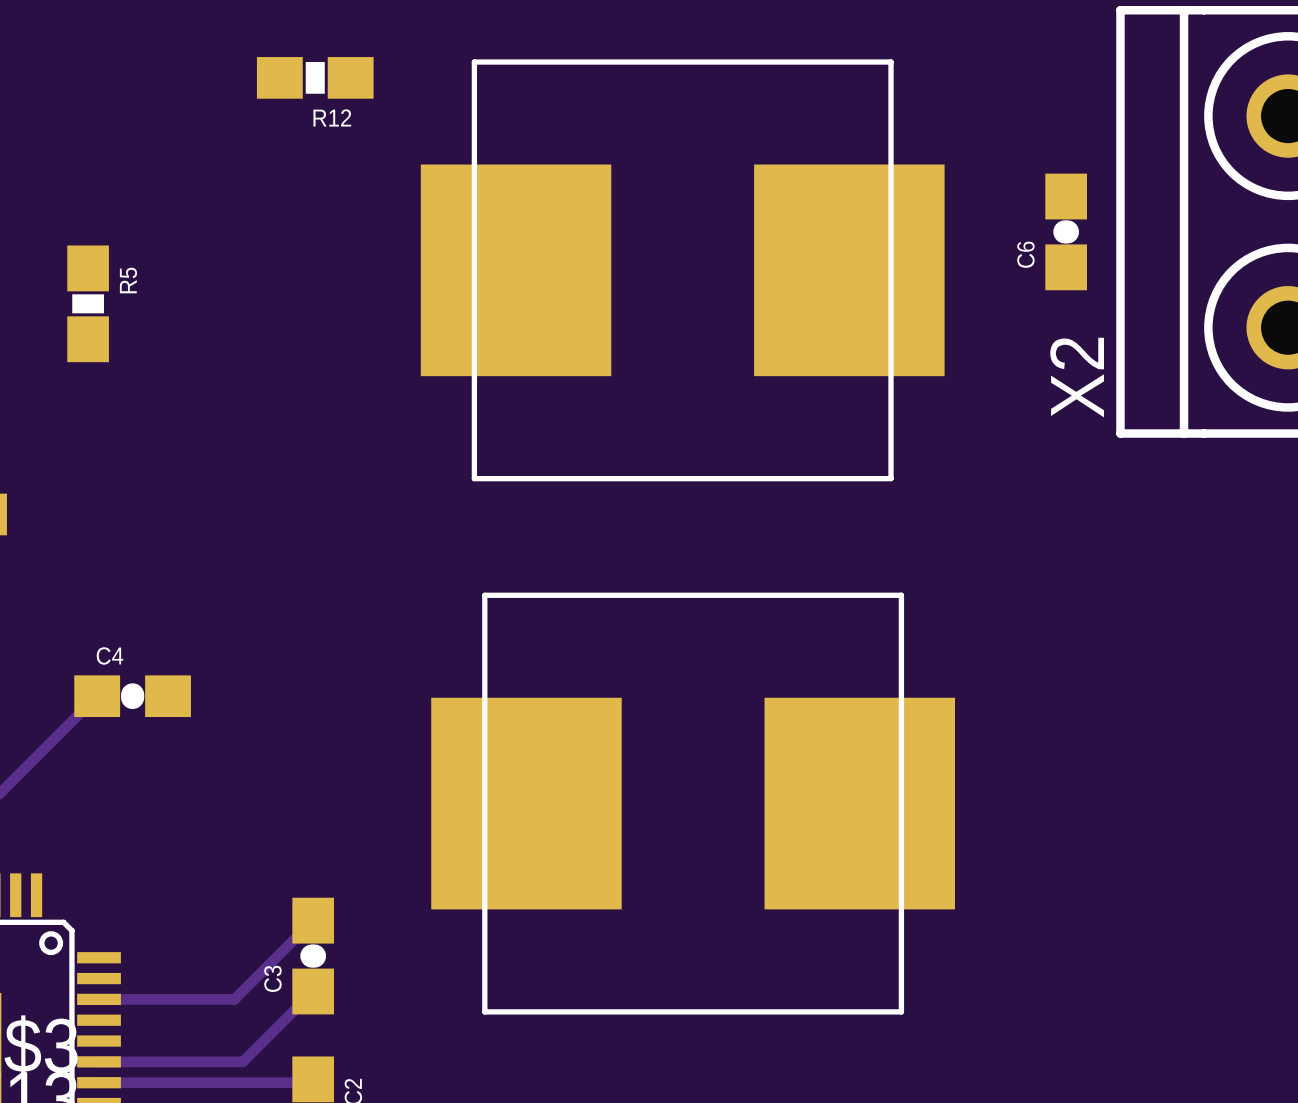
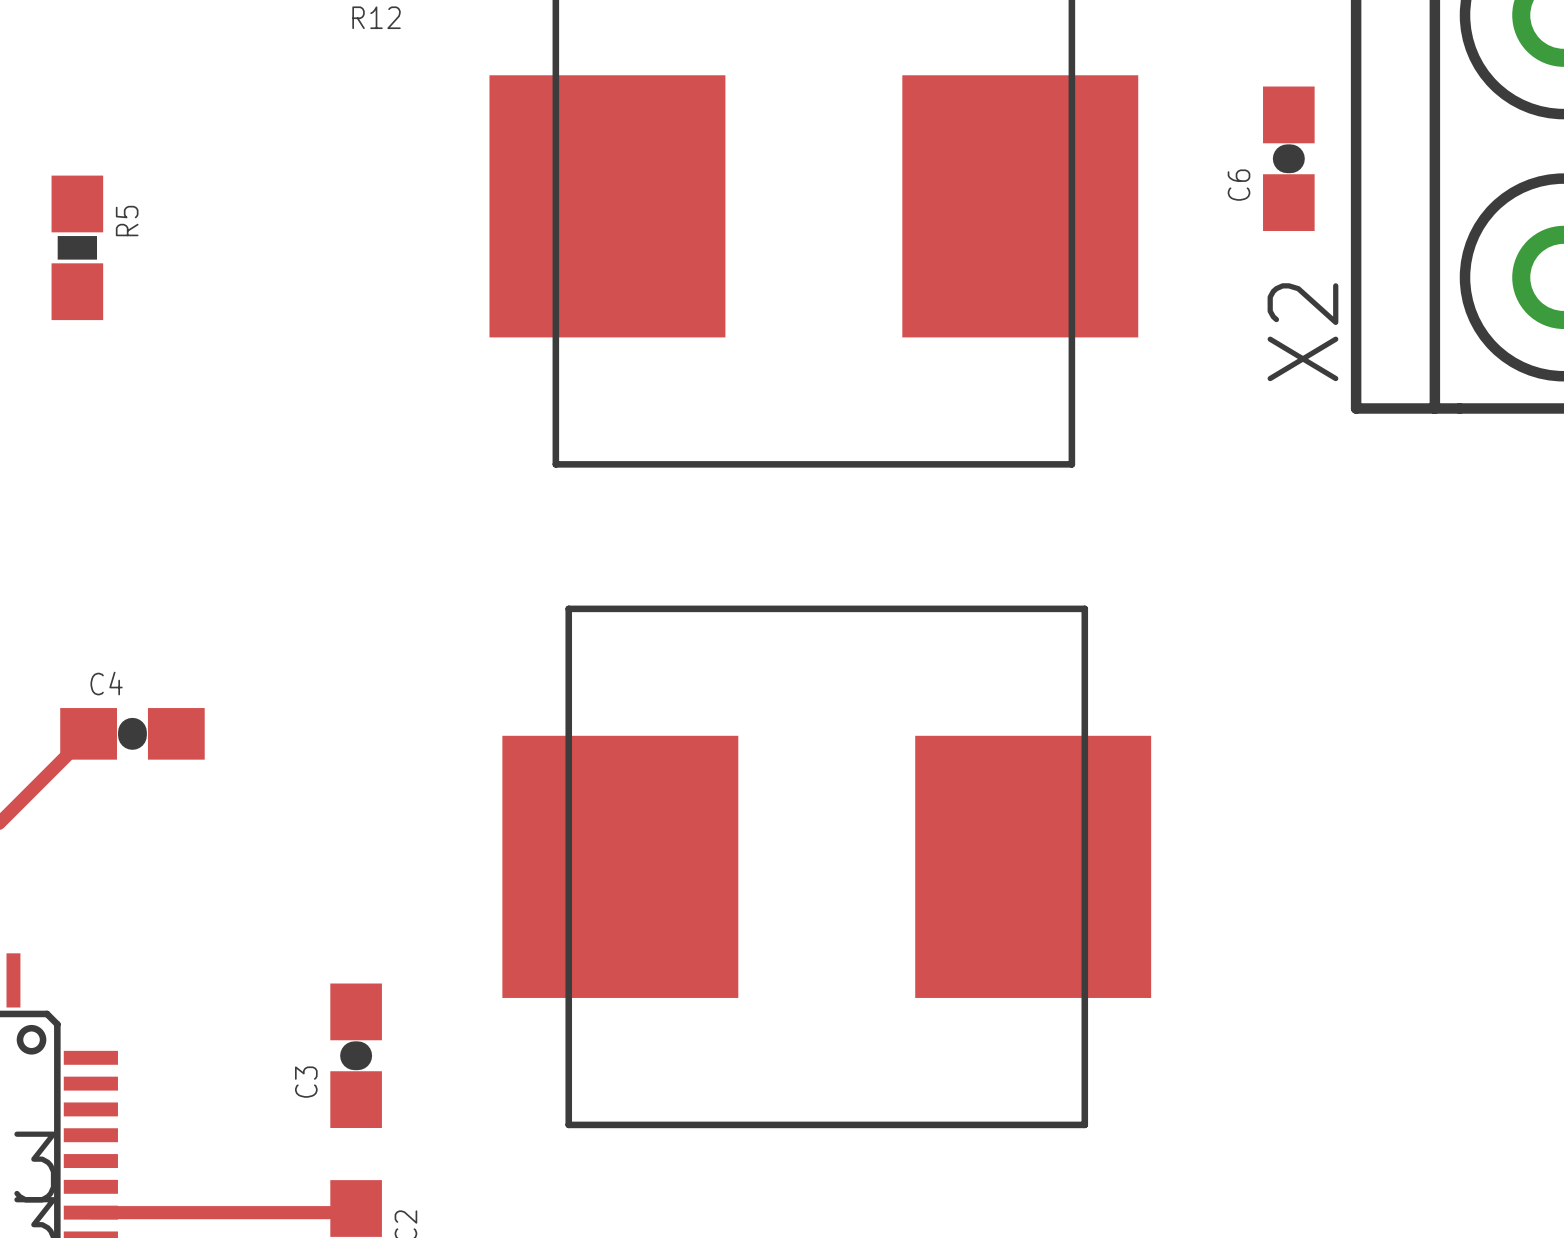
track: (313, 920) (234, 999) (99, 999) -> none
track: (313, 991) (242, 1061) (99, 1061) -> none

